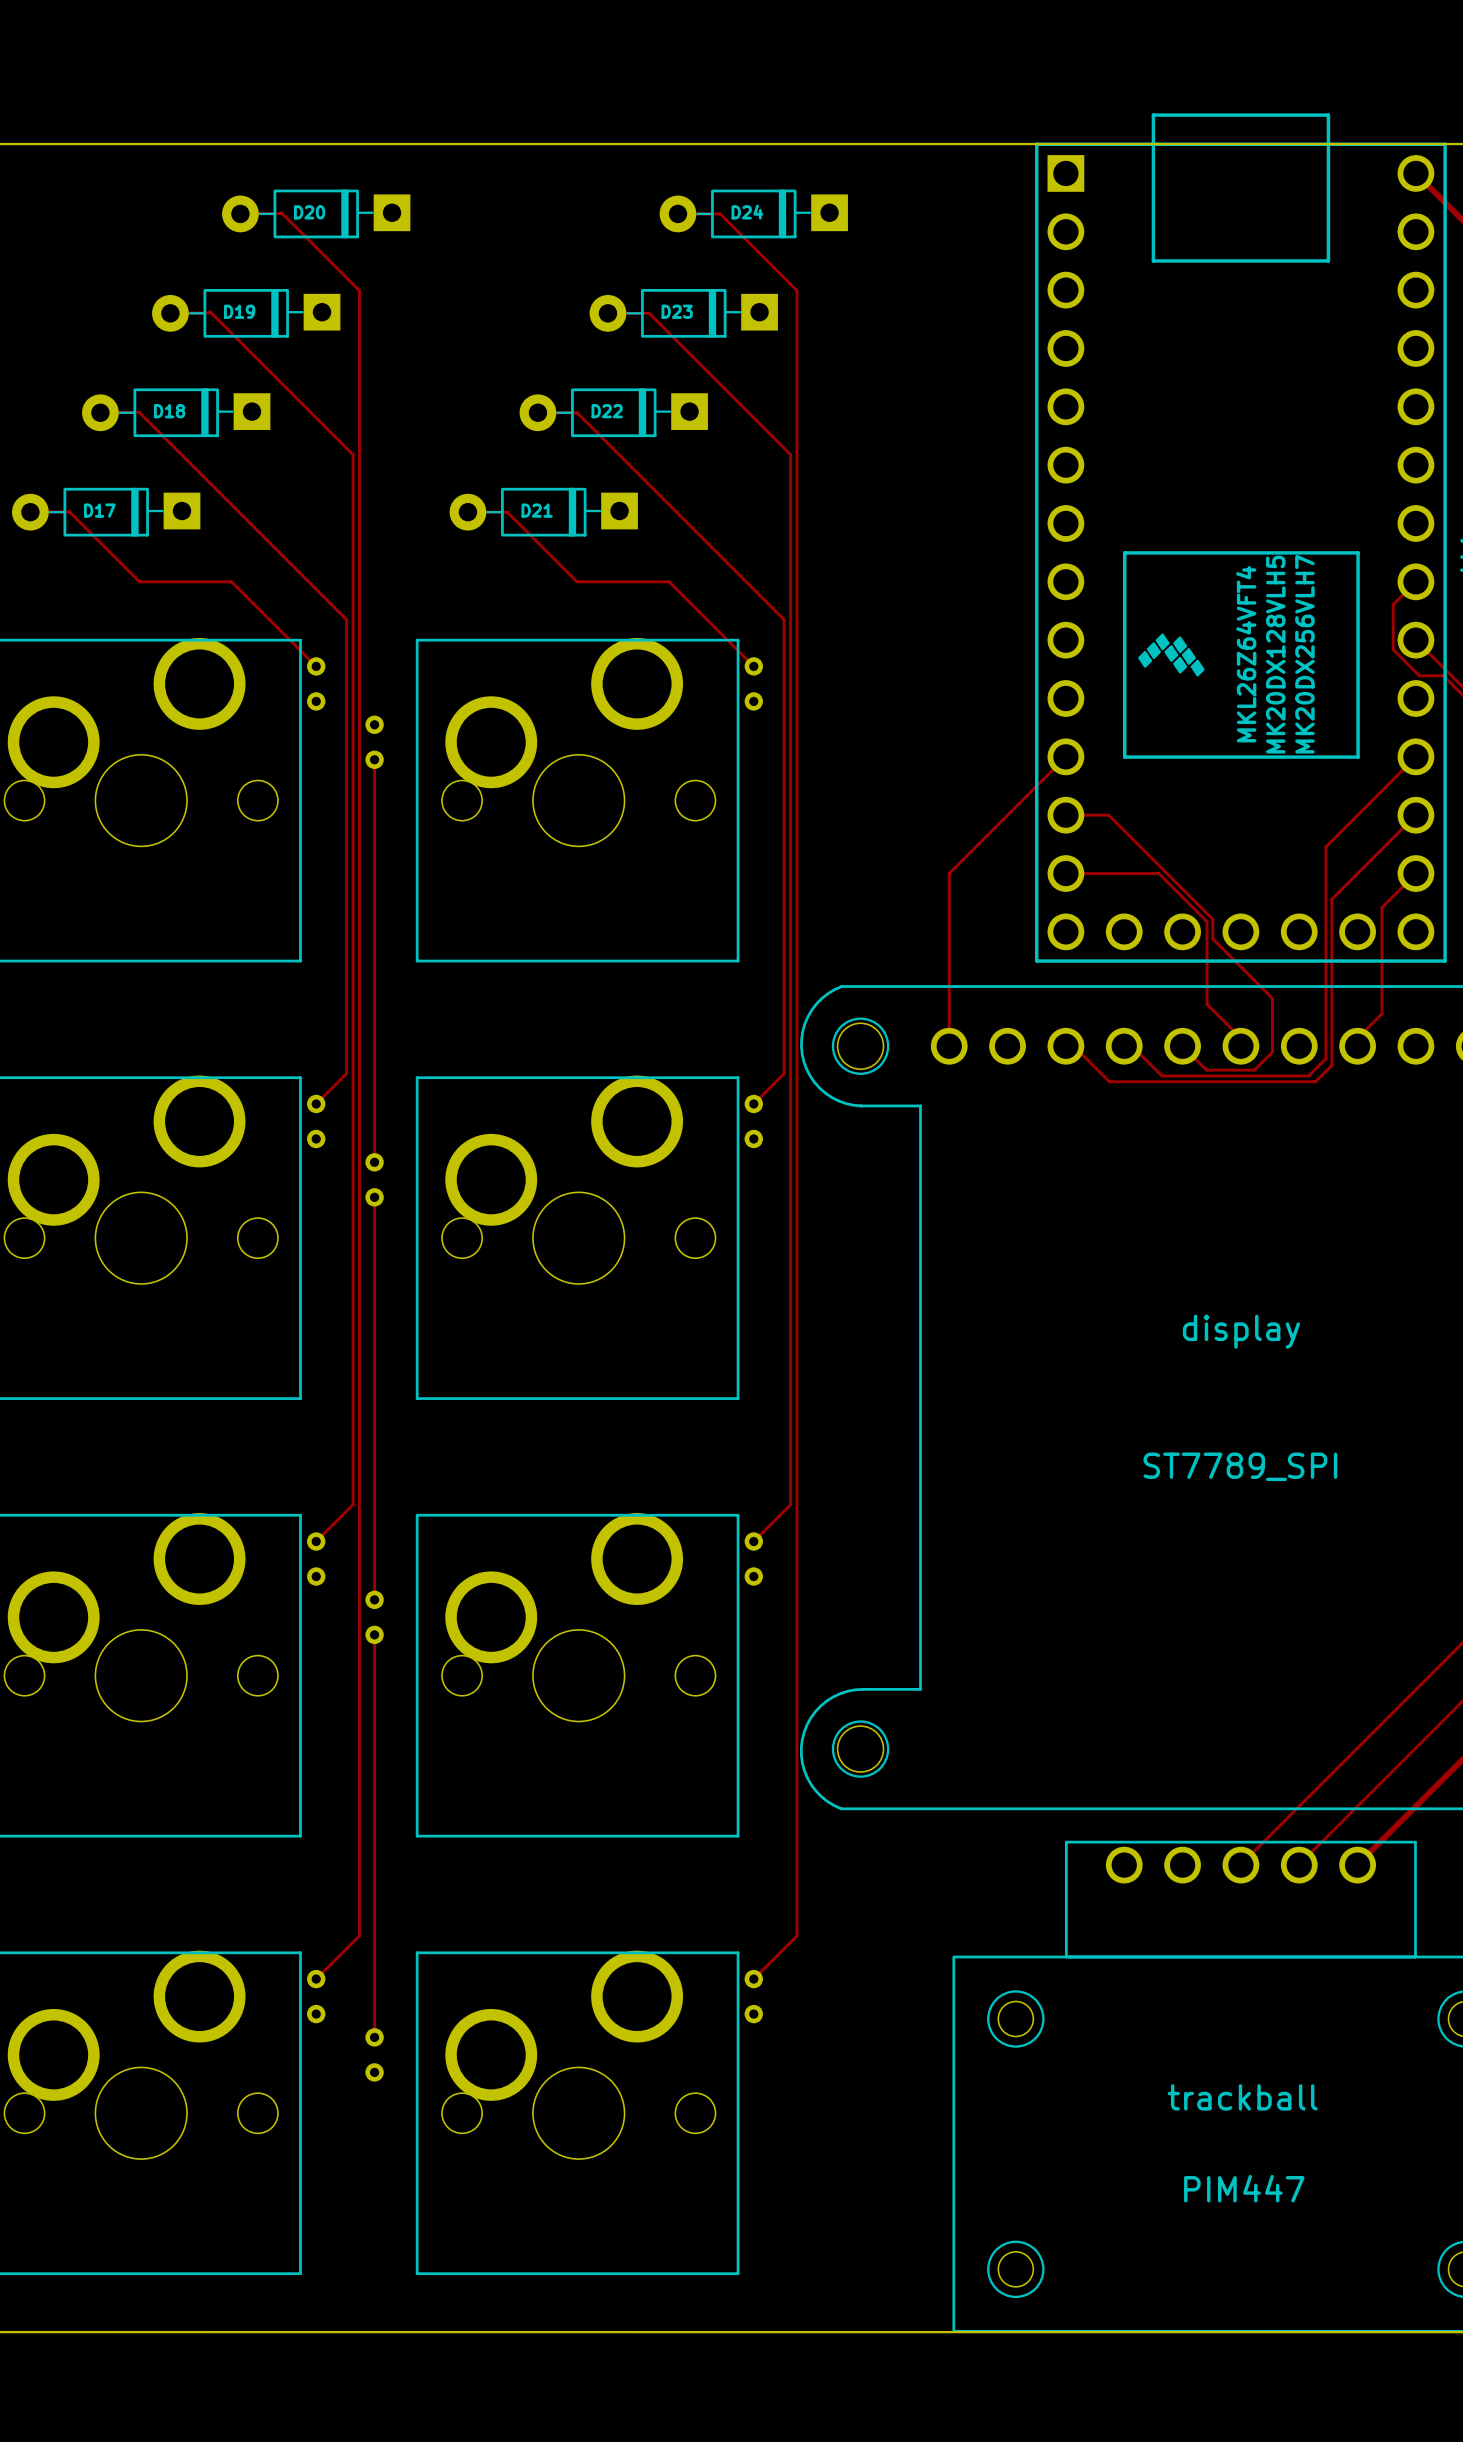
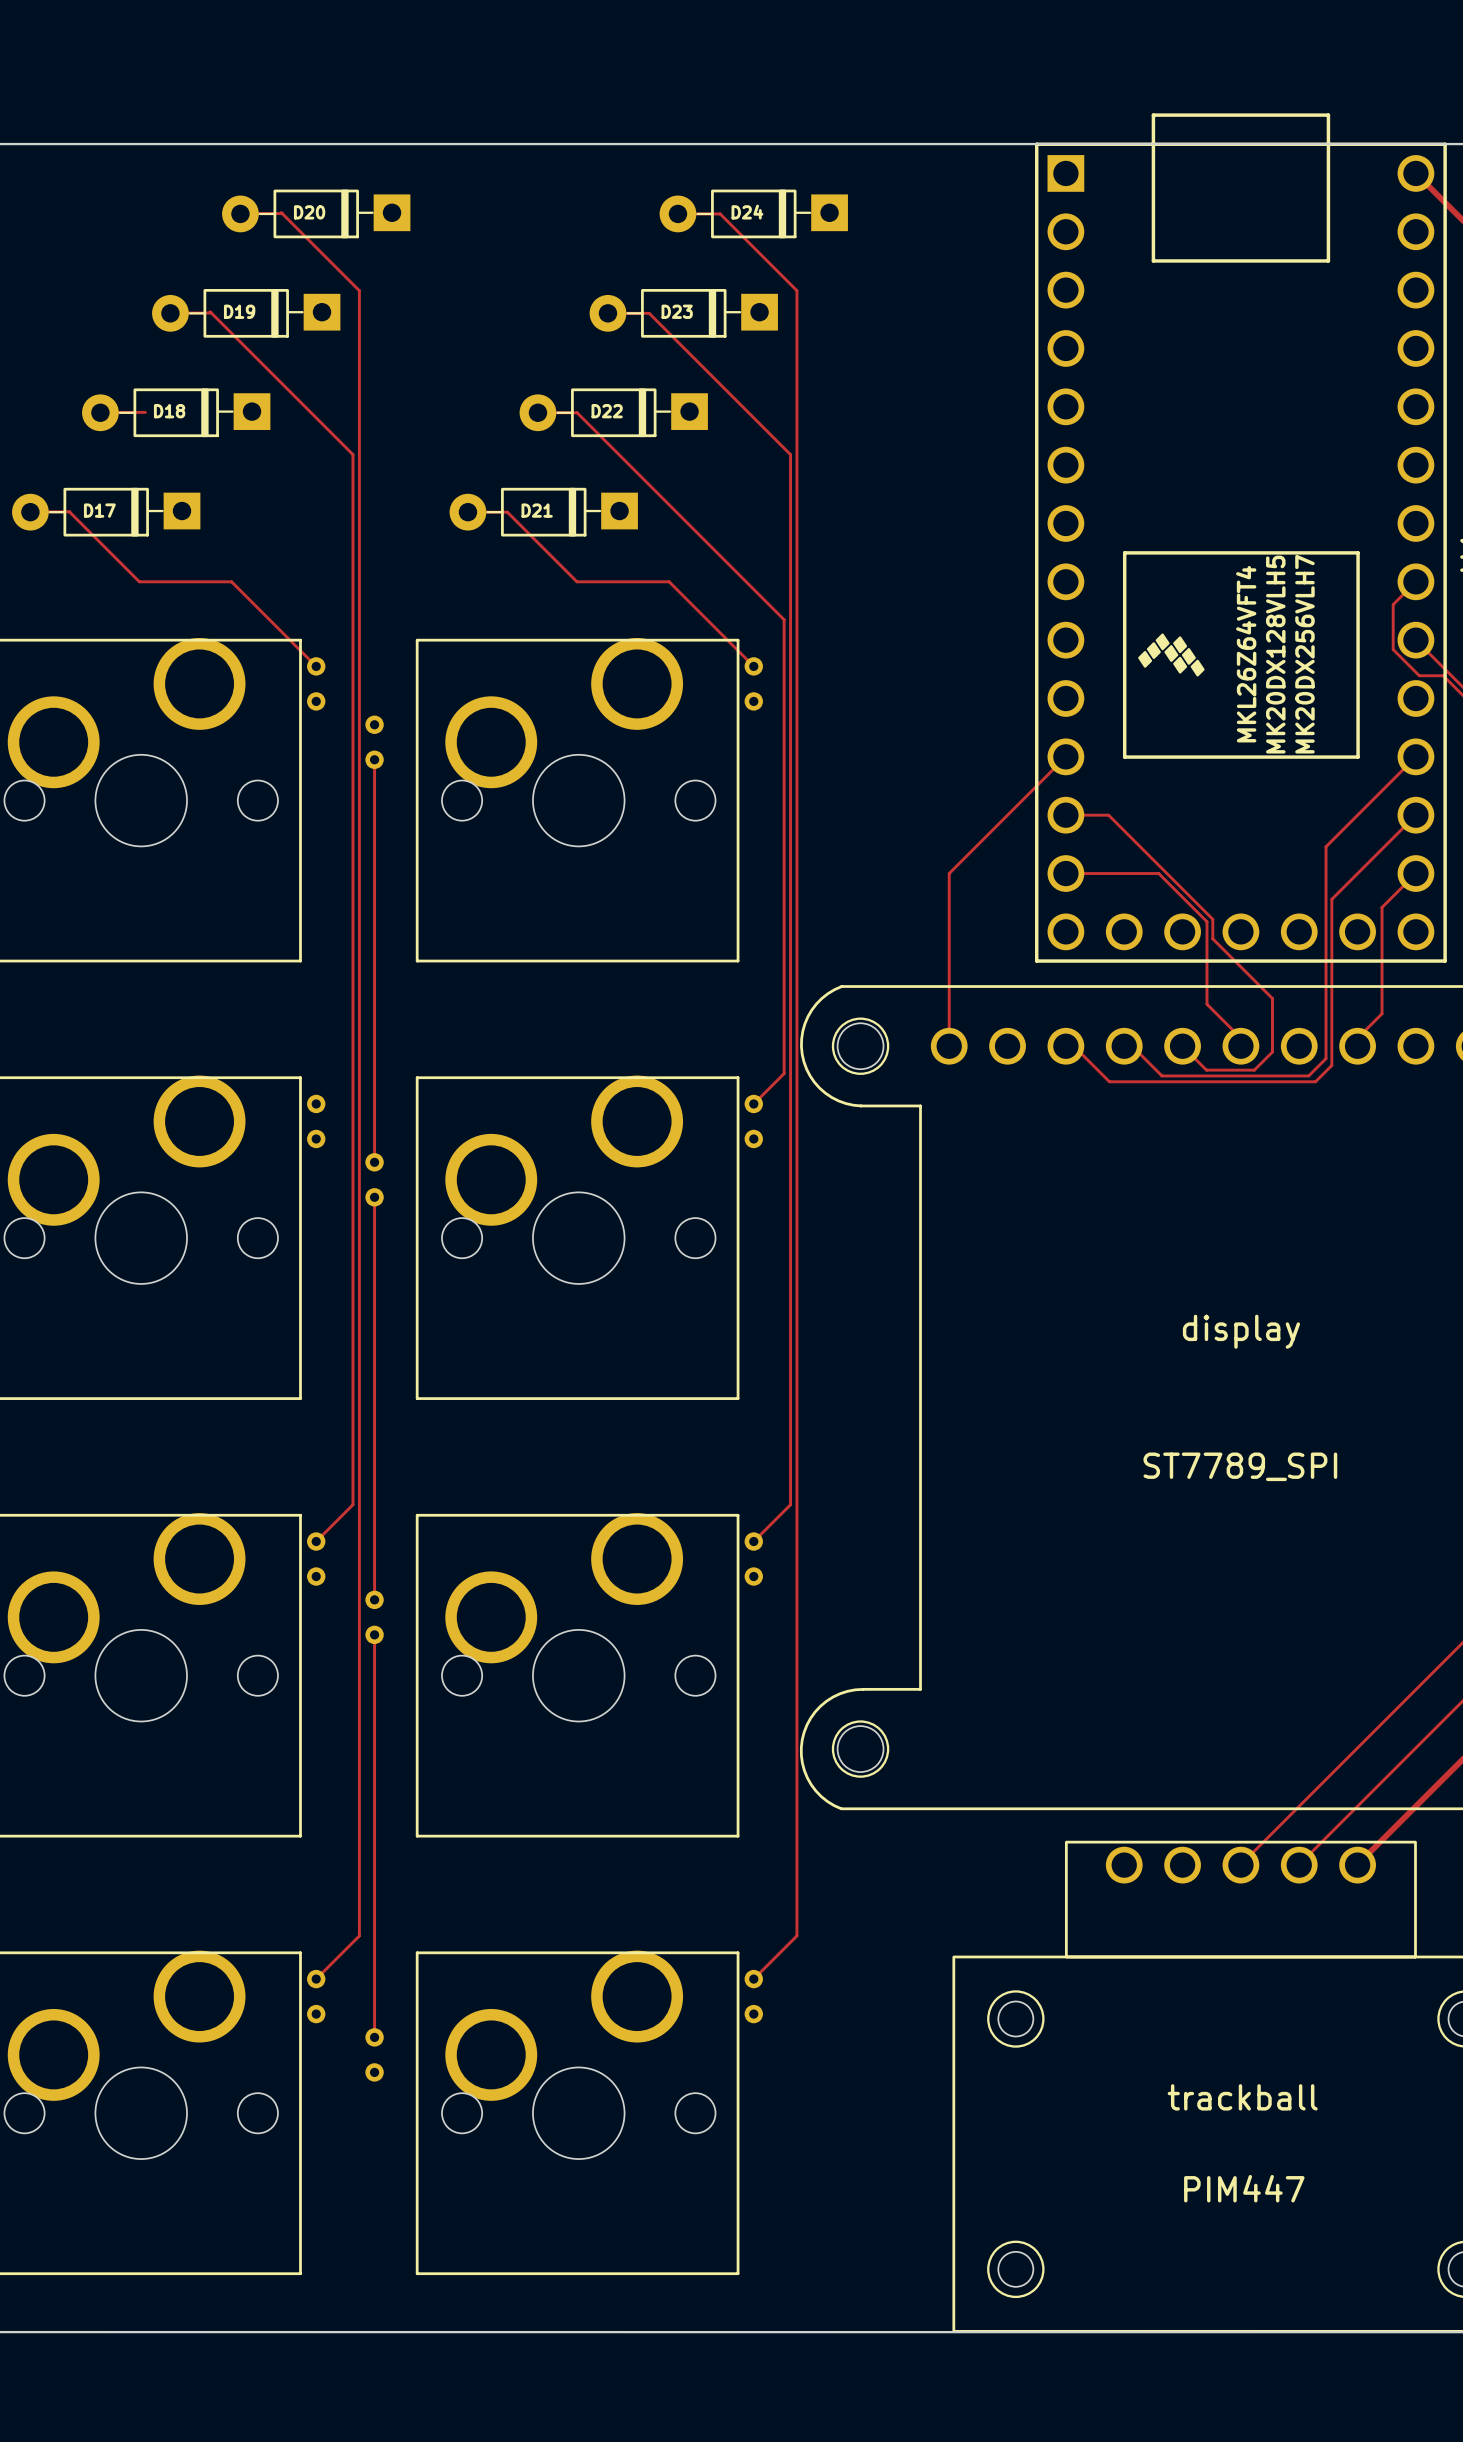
track: (139, 412) (346, 619) (346, 1073) (316, 1103) -> (139, 412) (145, 412)

